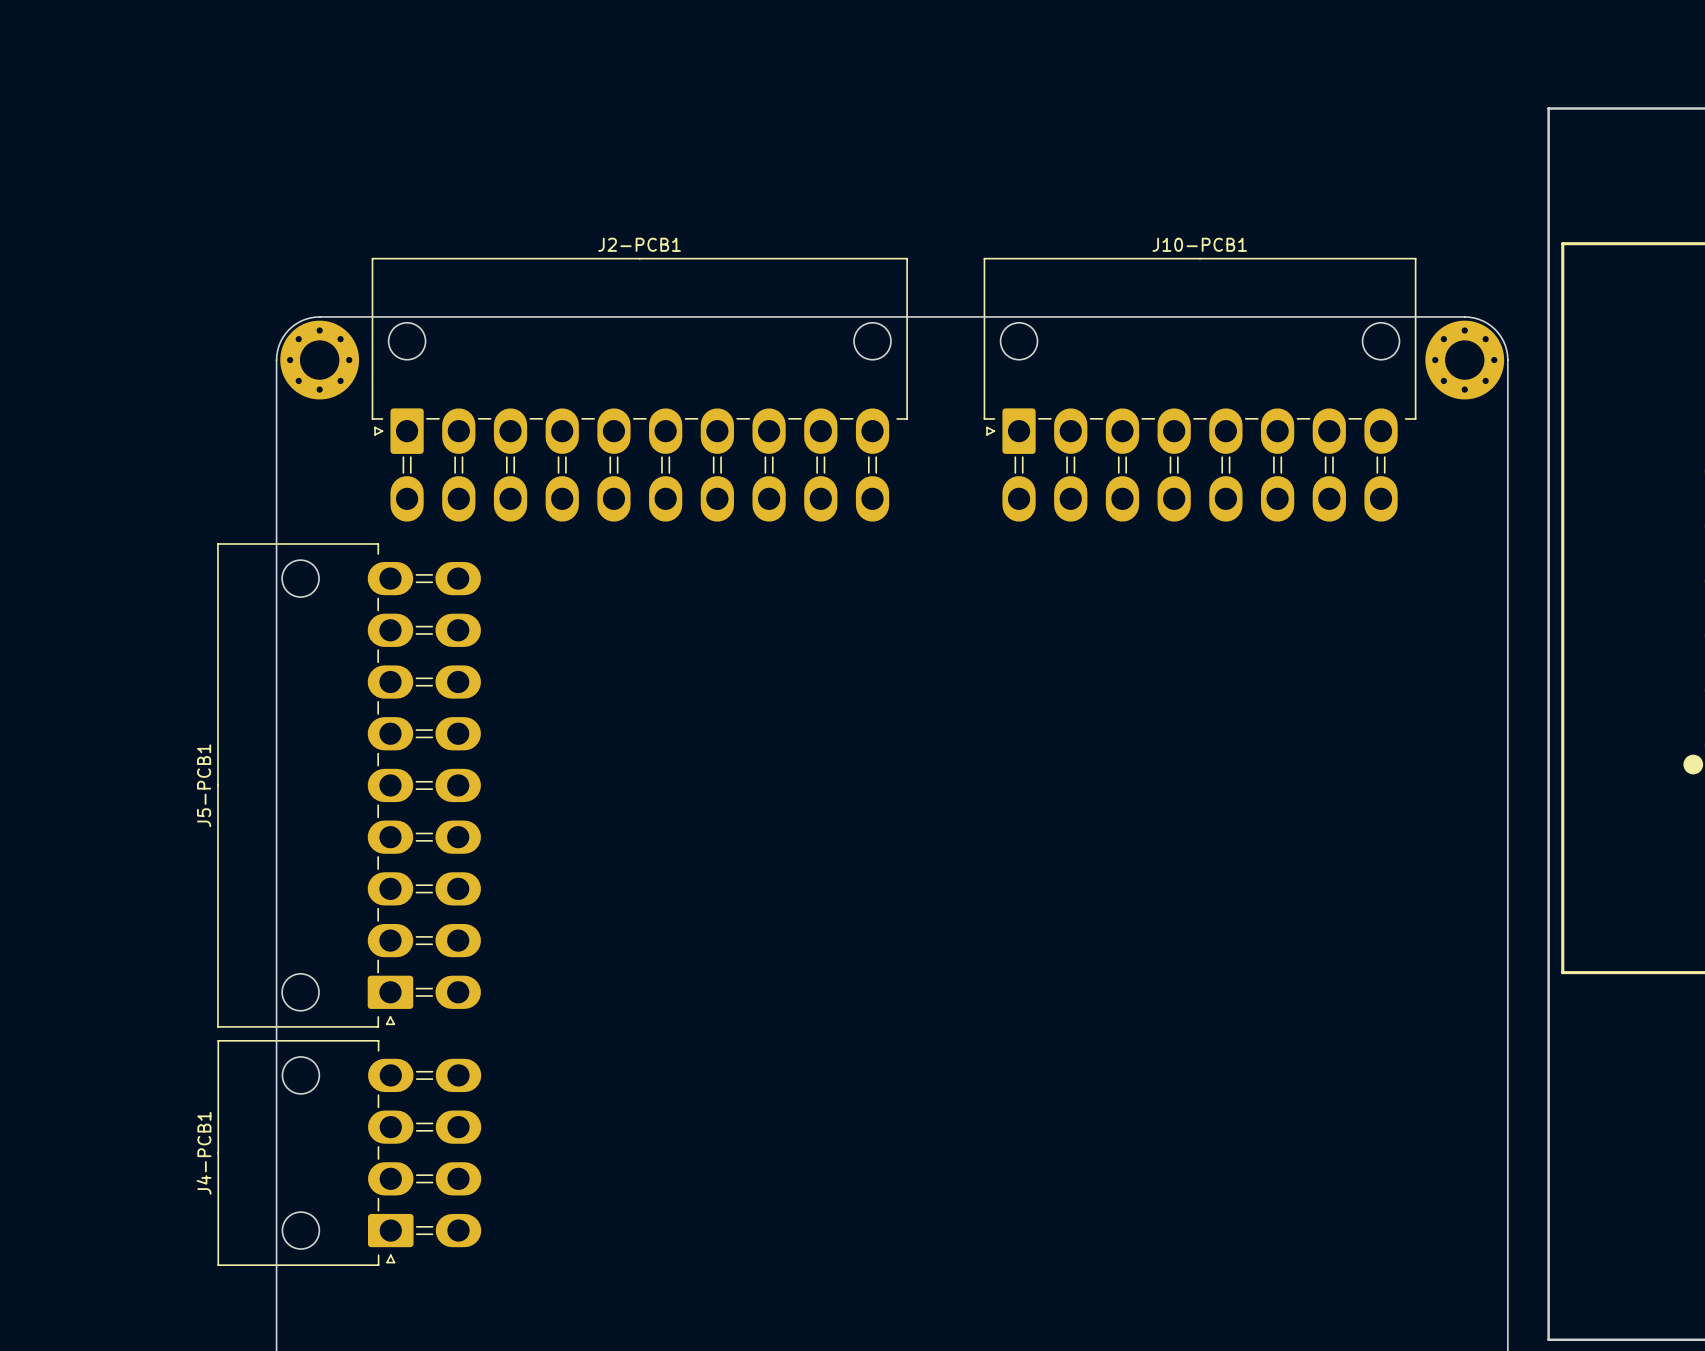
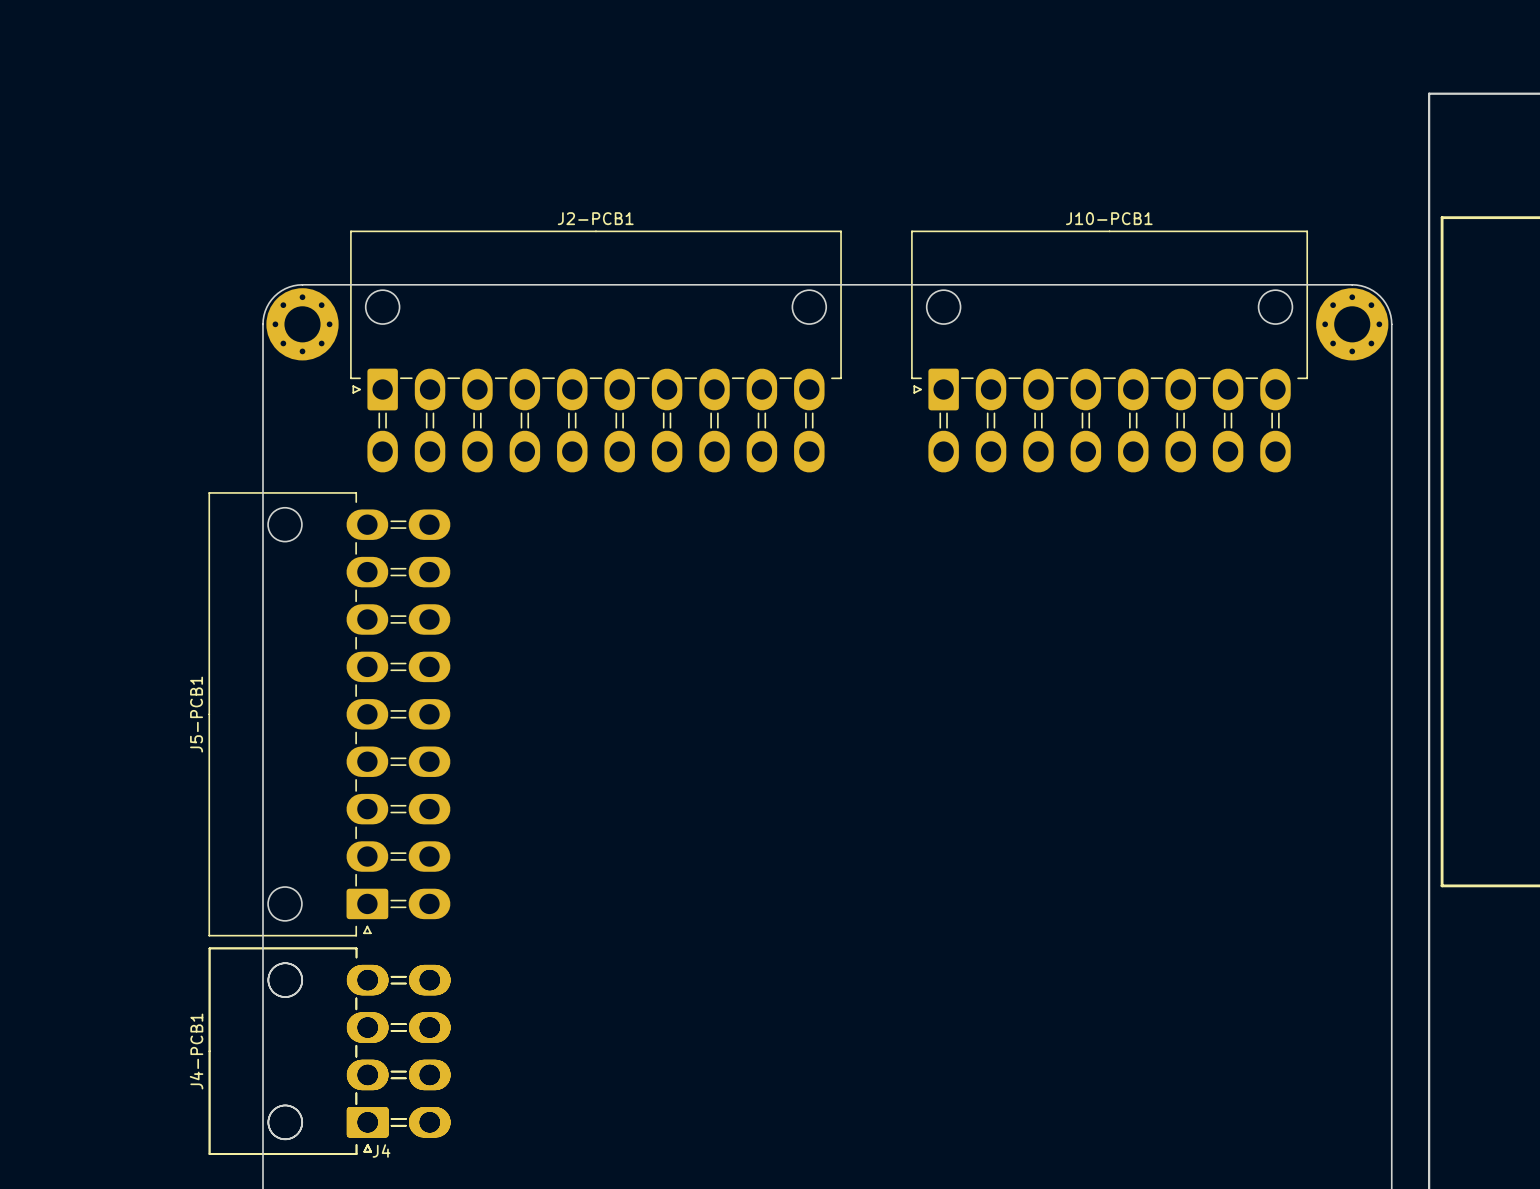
J4: none -> (329, 1051)

